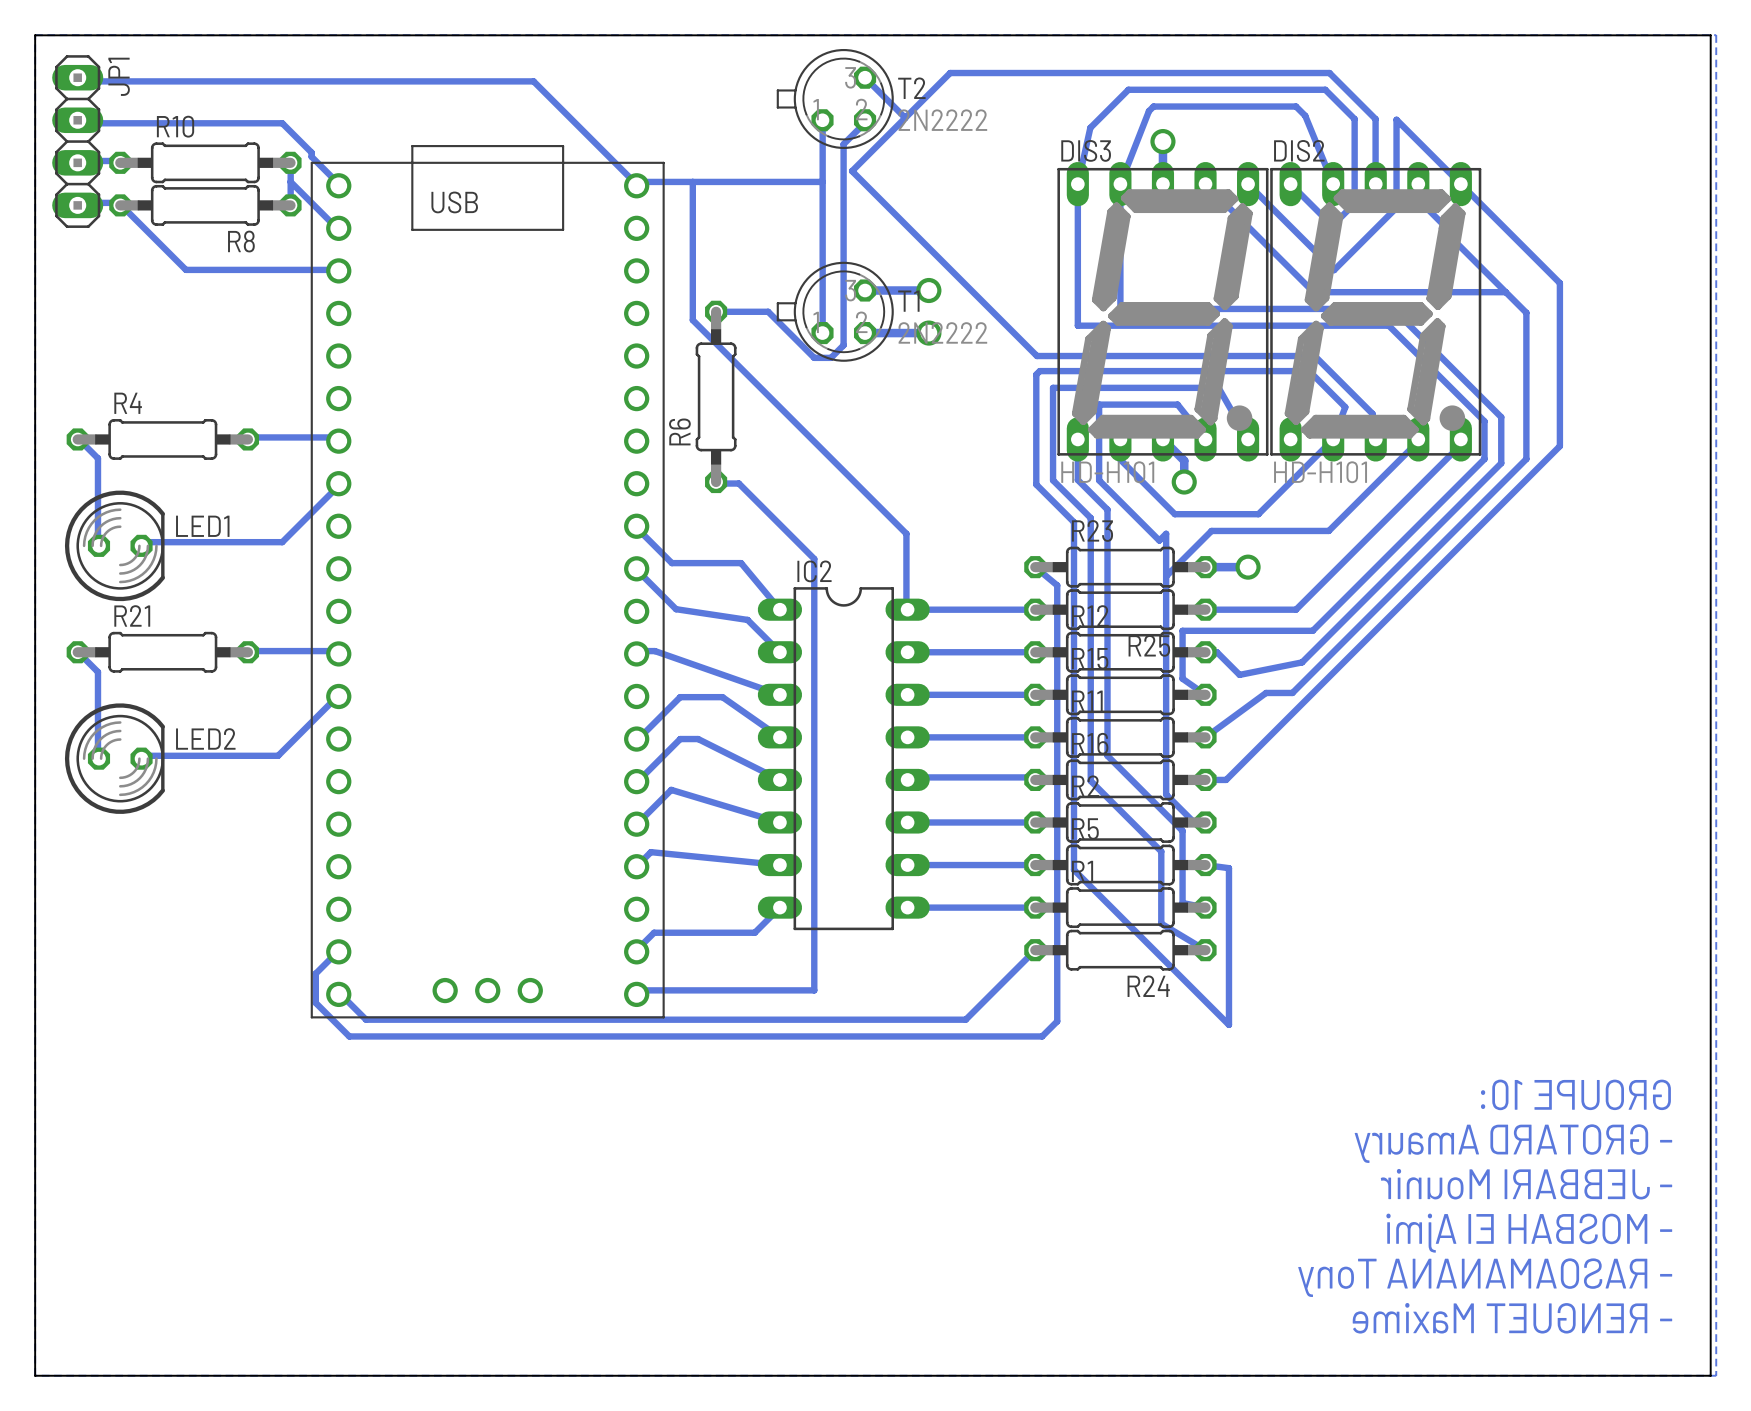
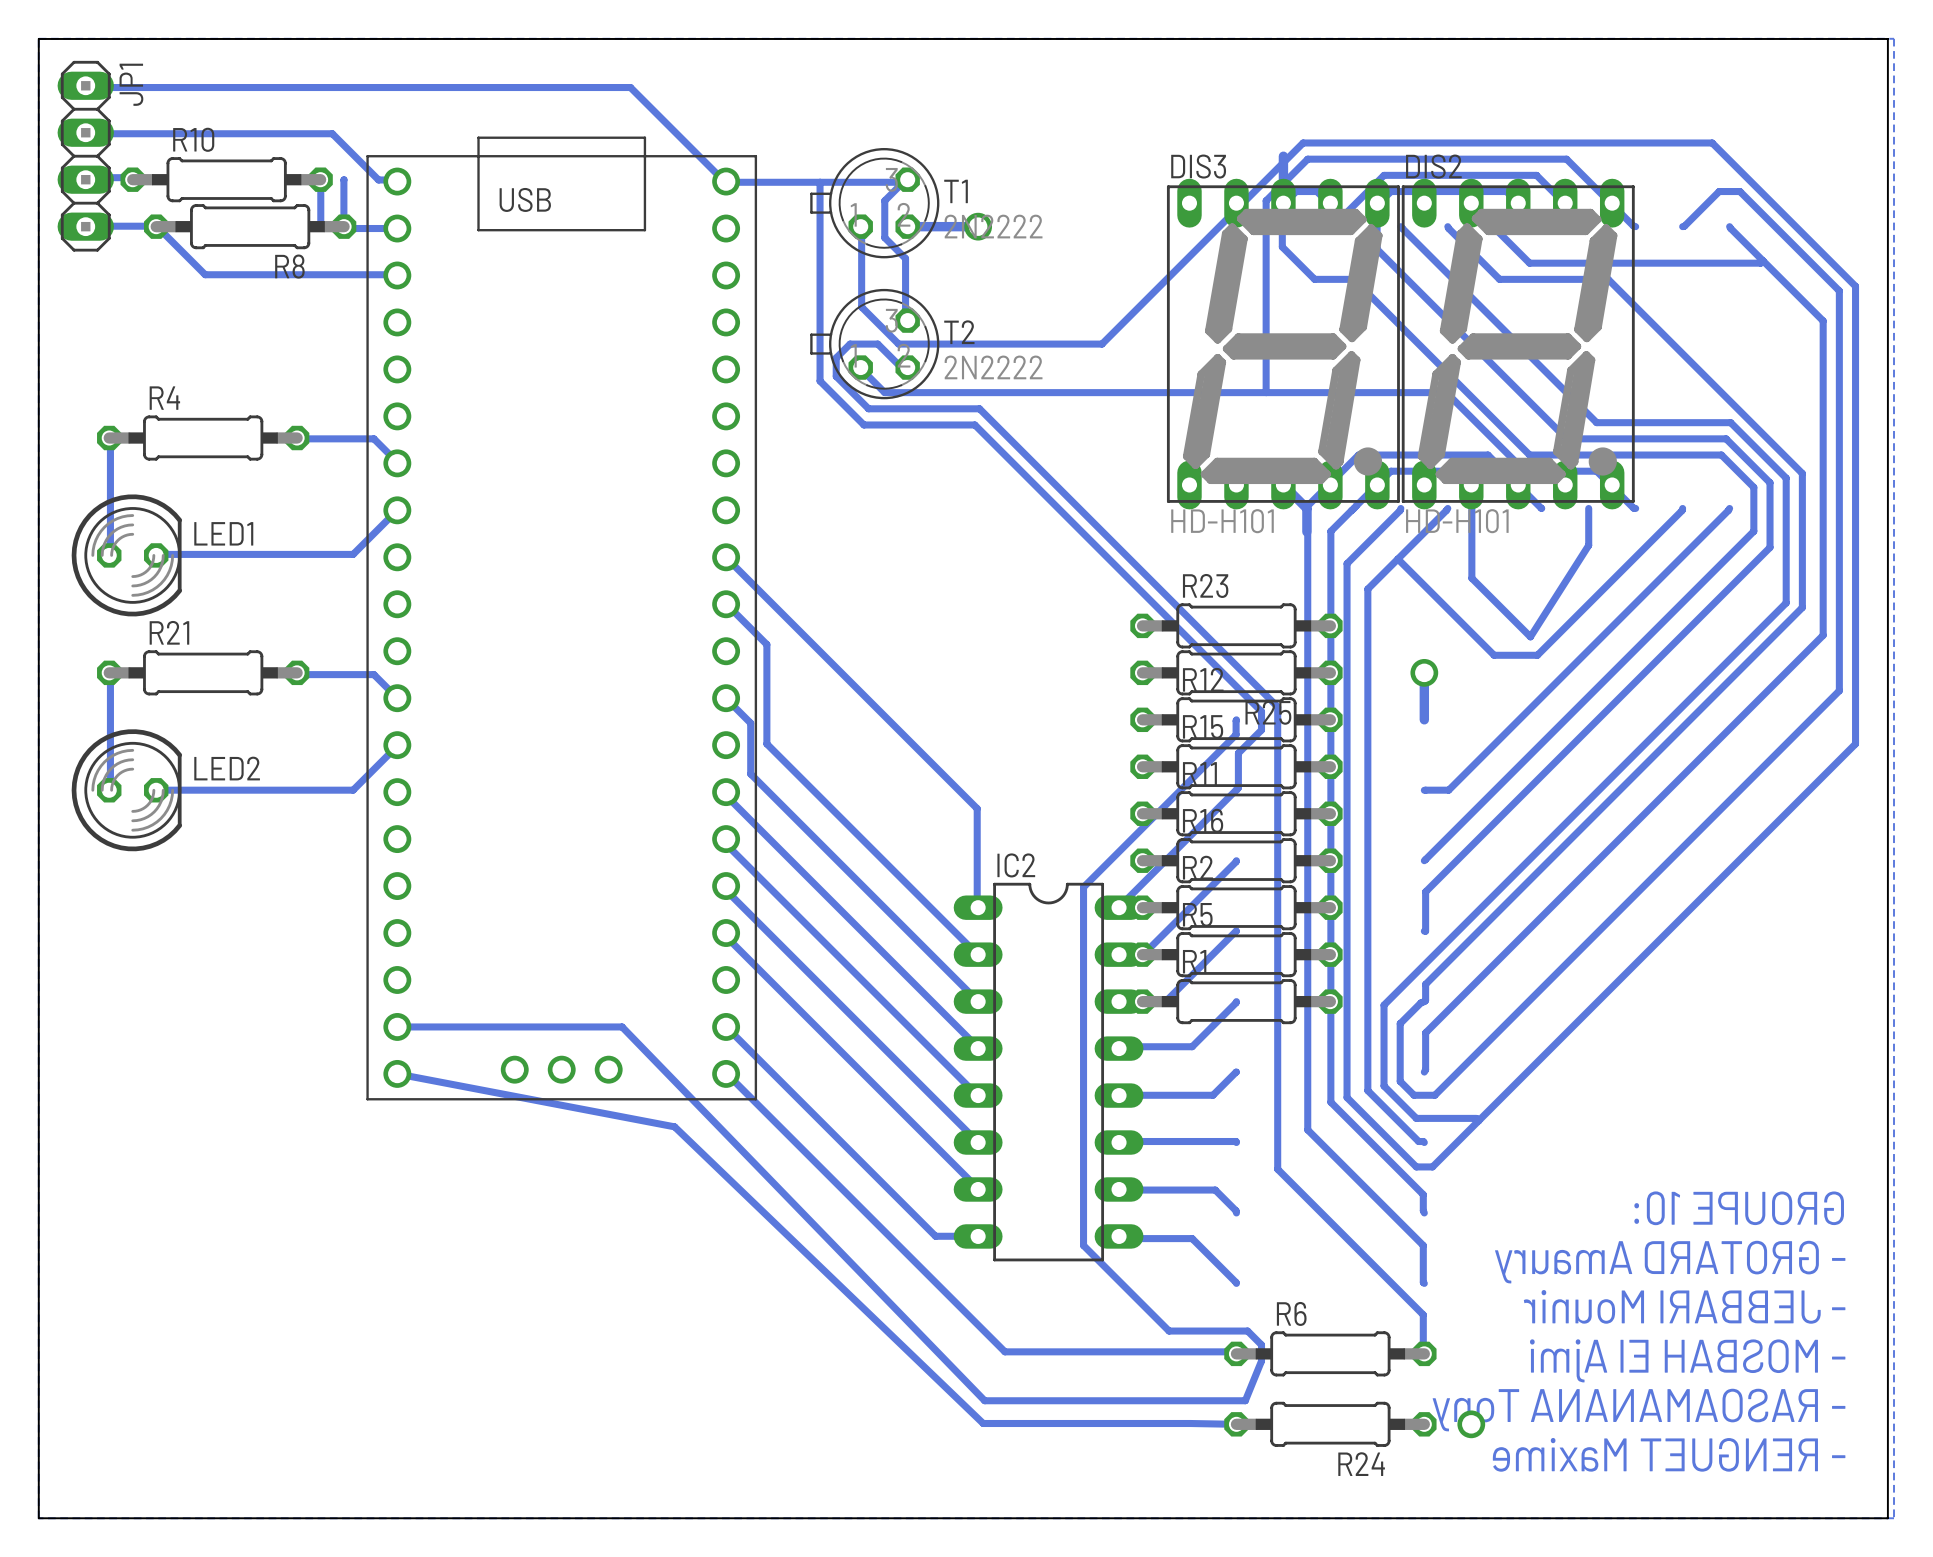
bottom track: (77, 77) (81, 81) (533, 81) (636, 185) (638, 181) (822, 181) -> (85, 85) (87, 87) (630, 87) (722, 179) (727, 182) (898, 182) (907, 179) (884, 200) (884, 237) (905, 258) (905, 318) (907, 320)
bottom track: (865, 77) (905, 117) -> none
T2 position: (835, 98) -> (874, 344)
bottom track: (77, 120) (81, 123) (282, 123) (311, 152) (311, 156) (338, 185) -> (85, 132) (332, 133) (378, 179) (397, 179) (397, 181)
bottom track: (822, 120) (822, 333) -> (1424, 1353) (1423, 1314) (1277, 1169) (1277, 706) (979, 408) (868, 408) (836, 376) (836, 357) (850, 344) (877, 344) (900, 367) (907, 367)
bottom track: (865, 120) (864, 123) (843, 144) (843, 345) (831, 357) (814, 357) (768, 311) (716, 311) -> none
via: (1162, 141) -> none
bottom track: none -> (343, 179) (344, 226) (346, 228) (397, 228)
bottom track: none -> (820, 182) (820, 381) (863, 424) (974, 424) (1261, 711) (1261, 730) (1238, 753) (1238, 787) (1119, 907)
bottom track: (290, 181) (338, 228) -> none
bottom track: (692, 181) (692, 320) (906, 533) (907, 609) (1035, 609) -> none
bottom track: (1205, 184) (1313, 292) (1505, 292) -> none
bottom track: (1248, 184) (1334, 270) (1396, 207) (1396, 119) (1559, 283) (1559, 446) (1226, 779) (1205, 779) -> none
bottom track: (1290, 184) (1332, 225) (1354, 203) (1354, 119) (1325, 89) (1128, 89) (1090, 127) (1077, 184) (1077, 325) (1388, 325) (1484, 421) (1484, 459) (1312, 630) (1182, 630) (1182, 678) (1205, 694) -> none
bottom track: (1333, 184) (1305, 115) (1296, 106) (1153, 106) (1148, 111) (1120, 184) (1120, 308) (1393, 308) (1501, 417) (1501, 463) (1302, 662) (1239, 674) (1217, 652) (1205, 652) -> none
bottom track: (1375, 184) (1375, 119) (1329, 73) (950, 73) (852, 171) (1036, 356) (1314, 356) (1372, 413) (1375, 439) -> none
bottom track: (1418, 184) (1418, 200) (1447, 228) (1441, 228) (1526, 312) (1526, 459) (1292, 692) (1266, 692) (1205, 737) -> none
bottom track: (77, 205) (81, 202) (118, 202) (185, 269) (338, 270) -> (85, 226) (156, 226) (205, 274) (397, 275)
R8 position: (205, 205) -> (250, 226)
bottom track: none -> (860, 226) (861, 307) (898, 344) (1102, 344) (1303, 142) (1712, 142) (1855, 286) (1855, 743) (1432, 1166) (1416, 1166) (1347, 1097) (1347, 563) (1400, 508)
via: none -> (978, 226)
bottom track: none -> (1400, 226) (1596, 422) (1730, 422) (1786, 478) (1786, 602) (1384, 1005) (1384, 1086) (1416, 1118) (1476, 1118) (1478, 1120)
bottom track: none -> (1447, 226) (1499, 279) (1608, 279) (1802, 473) (1802, 607) (1425, 984) (1425, 1000) (1400, 1023) (1400, 1081) (1414, 1095) (1434, 1095) (1839, 690) (1839, 290) (1739, 191) (1719, 191) (1682, 226)
bottom track: none -> (1494, 226) (1529, 263) (1760, 263) (1763, 260)
bottom track: none -> (1541, 226) (1506, 191) (1390, 191) (1377, 205) (1377, 249) (1566, 438) (1726, 438) (1770, 482) (1770, 547) (1425, 891) (1424, 931)
bottom track: none -> (1588, 226) (1536, 175) (1384, 175) (1344, 214) (1353, 226) (1316, 191) (1296, 191) (1282, 205) (1282, 247) (1314, 279) (1353, 279) (1529, 455) (1721, 455) (1753, 487) (1753, 531) (1424, 860)
bottom track: none -> (1635, 226) (1566, 159) (1307, 159) (1266, 200) (1266, 392)
bottom track: none -> (1729, 226) (1823, 320) (1823, 635) (1425, 1032) (1424, 1072)
bottom track: (865, 290) (928, 290) -> (907, 226) (978, 226)
via: (928, 290) -> none
T1 position: (835, 311) -> (874, 203)
bottom track: none -> (860, 367) (884, 392) (1446, 392) (1525, 471) (1596, 471) (1635, 508)
bottom track: (865, 333) (928, 333) -> none
via: (928, 333) -> none
bottom track: none -> (109, 438) (109, 555)
bottom track: none -> (297, 438) (373, 438) (397, 463)
R6 rotation: 0° (716, 396) -> 90° clockwise (1330, 1353)
R6 position: (716, 396) -> (1330, 1353)
bottom track: (77, 439) (97, 458) (98, 545) -> none
R4 position: (162, 439) -> (203, 438)
bottom track: (247, 439) (248, 437) (336, 437) (338, 441) -> none
bottom track: (1077, 439) (1077, 480) (1107, 509) (1107, 755) (1182, 830) (1182, 903) (1205, 907) -> none
bottom track: (1120, 439) (1120, 459) (1174, 514) (1258, 514) (1333, 439) (1345, 407) (1309, 371) (1039, 371) (1036, 374) (1036, 484) (1073, 522) (1073, 869) (1228, 1024) (1228, 868) (1205, 865) -> none
bottom track: (1205, 439) (1177, 404) (1099, 404) (1099, 480) (1159, 540) (1166, 533) (1166, 794) (1194, 822) (1205, 822) -> none
bottom track: (1248, 439) (1218, 387) (1053, 387) (1053, 480) (1090, 518) (1090, 780) (1161, 851) (1161, 923) (1205, 950) -> none
bottom track: (1418, 439) (1328, 530) (1211, 530) (1166, 576) -> none
bottom track: (1460, 439) (1460, 444) (1296, 609) (1205, 609) -> none
bottom track: none -> (1447, 508) (1367, 589) (1367, 1090) (1418, 1141) (1424, 1142)
bottom track: none -> (1541, 508) (1488, 455) (1358, 455) (1306, 508) (1307, 1129) (1423, 1245) (1424, 1283)
bottom track: none -> (1588, 508) (1588, 545) (1530, 636) (1471, 578) (1471, 487) (1455, 471) (1390, 471) (1330, 531) (1330, 1102) (1423, 1194) (1424, 1212)
bottom track: none -> (1682, 508) (1537, 655) (1494, 655) (1397, 559)
bottom track: none -> (1729, 508) (1448, 790) (1424, 790)
bottom track: none -> (397, 510) (353, 554) (156, 555)
bottom track: (716, 482) (738, 483) (814, 558) (814, 990) (638, 990) (636, 994) -> none
via: (1184, 482) -> none
bottom track: (338, 483) (282, 542) (144, 542) (141, 545) -> none
bottom track: none -> (726, 557) (977, 808) (978, 907)
bottom track: (636, 526) (671, 563) (741, 563) (779, 609) -> none
LED1 position: (114, 545) -> (126, 555)
bottom track: none -> (726, 604) (766, 644) (766, 743) (978, 954)
bottom track: (1035, 567) (1057, 585) (1057, 1021) (1042, 1036) (349, 1036) (315, 1002) (315, 973) (338, 951) -> none
bottom track: (1205, 567) (1248, 567) -> none
via position: (1248, 567) -> (1424, 672)
bottom track: (636, 568) (676, 609) (747, 619) (779, 652) -> none
part position: (487, 581) -> (561, 618)
bottom track: none -> (109, 672) (109, 790)
bottom track: none -> (297, 672) (297, 674) (373, 674) (397, 698)
bottom track: none -> (1424, 672) (1424, 719)
bottom track: none -> (726, 698) (750, 723) (750, 774) (978, 1001)
bottom track: (77, 652) (97, 672) (98, 758) -> none
R21 position: (162, 652) -> (203, 672)
bottom track: (247, 652) (336, 651) (338, 653) -> none
bottom track: (907, 652) (1035, 652) -> none
bottom track: none -> (1236, 719) (1236, 734) (1083, 887) (1083, 1245) (1169, 1331) (1247, 1331) (1261, 1344) (1261, 1361) (1245, 1400) (984, 1400) (622, 1026) (397, 1026)
bottom track: (636, 653) (638, 651) (654, 651) (779, 694) -> none
bottom track: none -> (397, 745) (353, 790) (156, 790)
bottom track: (907, 694) (1035, 694) -> none
bottom track: (338, 696) (278, 755) (144, 755) (141, 758) -> none
bottom track: none -> (726, 792) (727, 797) (978, 1048)
bottom track: (779, 737) (722, 697) (680, 697) (636, 739) -> none
bottom track: (907, 737) (1035, 737) -> none
LED2 position: (114, 758) -> (126, 790)
IC2 position: (843, 758) -> (1048, 1072)
bottom track: none -> (726, 839) (727, 845) (978, 1095)
bottom track: (779, 779) (698, 739) (680, 739) (636, 781) -> none
bottom track: (907, 779) (910, 777) (1032, 777) (1035, 779) -> none
bottom track: none -> (1236, 860) (1143, 954) (1119, 954)
bottom track: none -> (726, 886) (727, 891) (978, 1142)
bottom track: (779, 822) (671, 789) (636, 824) -> none
bottom track: (907, 822) (1035, 822) -> none
bottom track: none -> (1236, 931) (1166, 1000) (1119, 1001)
bottom track: none -> (726, 933) (727, 938) (978, 1189)
bottom track: (779, 865) (650, 852) (636, 866) -> none
bottom track: (907, 865) (1035, 865) -> none
bottom track: (779, 907) (754, 932) (654, 932) (636, 951) -> none
bottom track: (907, 907) (1035, 907) -> none
bottom track: none -> (1236, 1001) (1192, 1046) (1120, 1046) (1119, 1048)
bottom track: none -> (726, 1026) (935, 1236) (978, 1236)
bottom track: (1035, 950) (965, 1019) (366, 1019) (338, 994) -> none
R24 position: (1120, 950) -> (1330, 1424)
bottom track: none -> (1236, 1072) (1212, 1095) (1119, 1095)
bottom track: none -> (397, 1073) (674, 1126) (983, 1423) (1236, 1424)
bottom track: none -> (726, 1073) (1004, 1351) (1236, 1351) (1236, 1353)
bottom track: none -> (1119, 1142) (1236, 1142)
bottom track: none -> (1119, 1189) (1215, 1190) (1236, 1212)
bottom track: none -> (1119, 1236) (1120, 1238) (1192, 1238) (1236, 1283)
via: none -> (1471, 1424)

